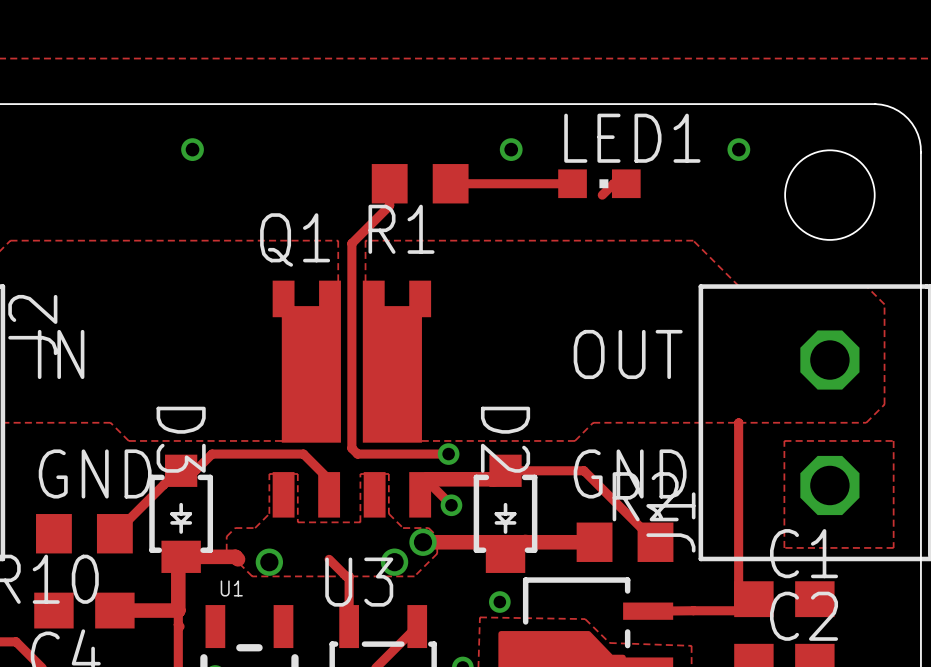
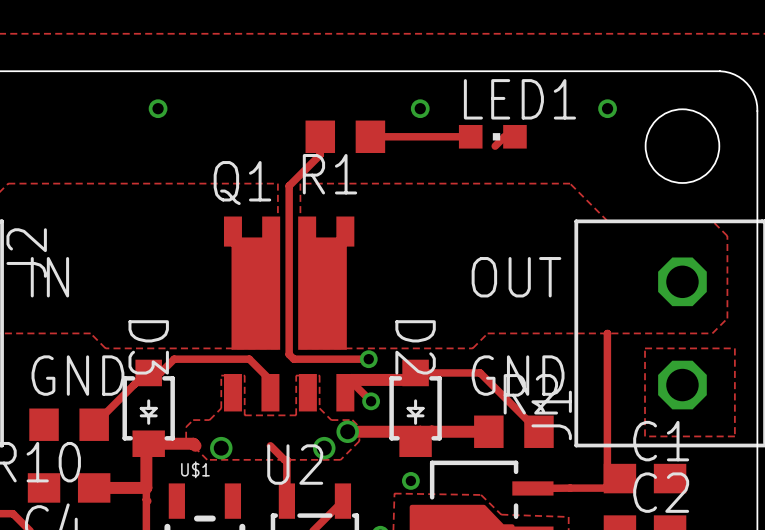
U3 name: U3 (359, 582) -> U2 (295, 464)
U1 name: U1 (231, 588) -> U$1 (195, 469)

